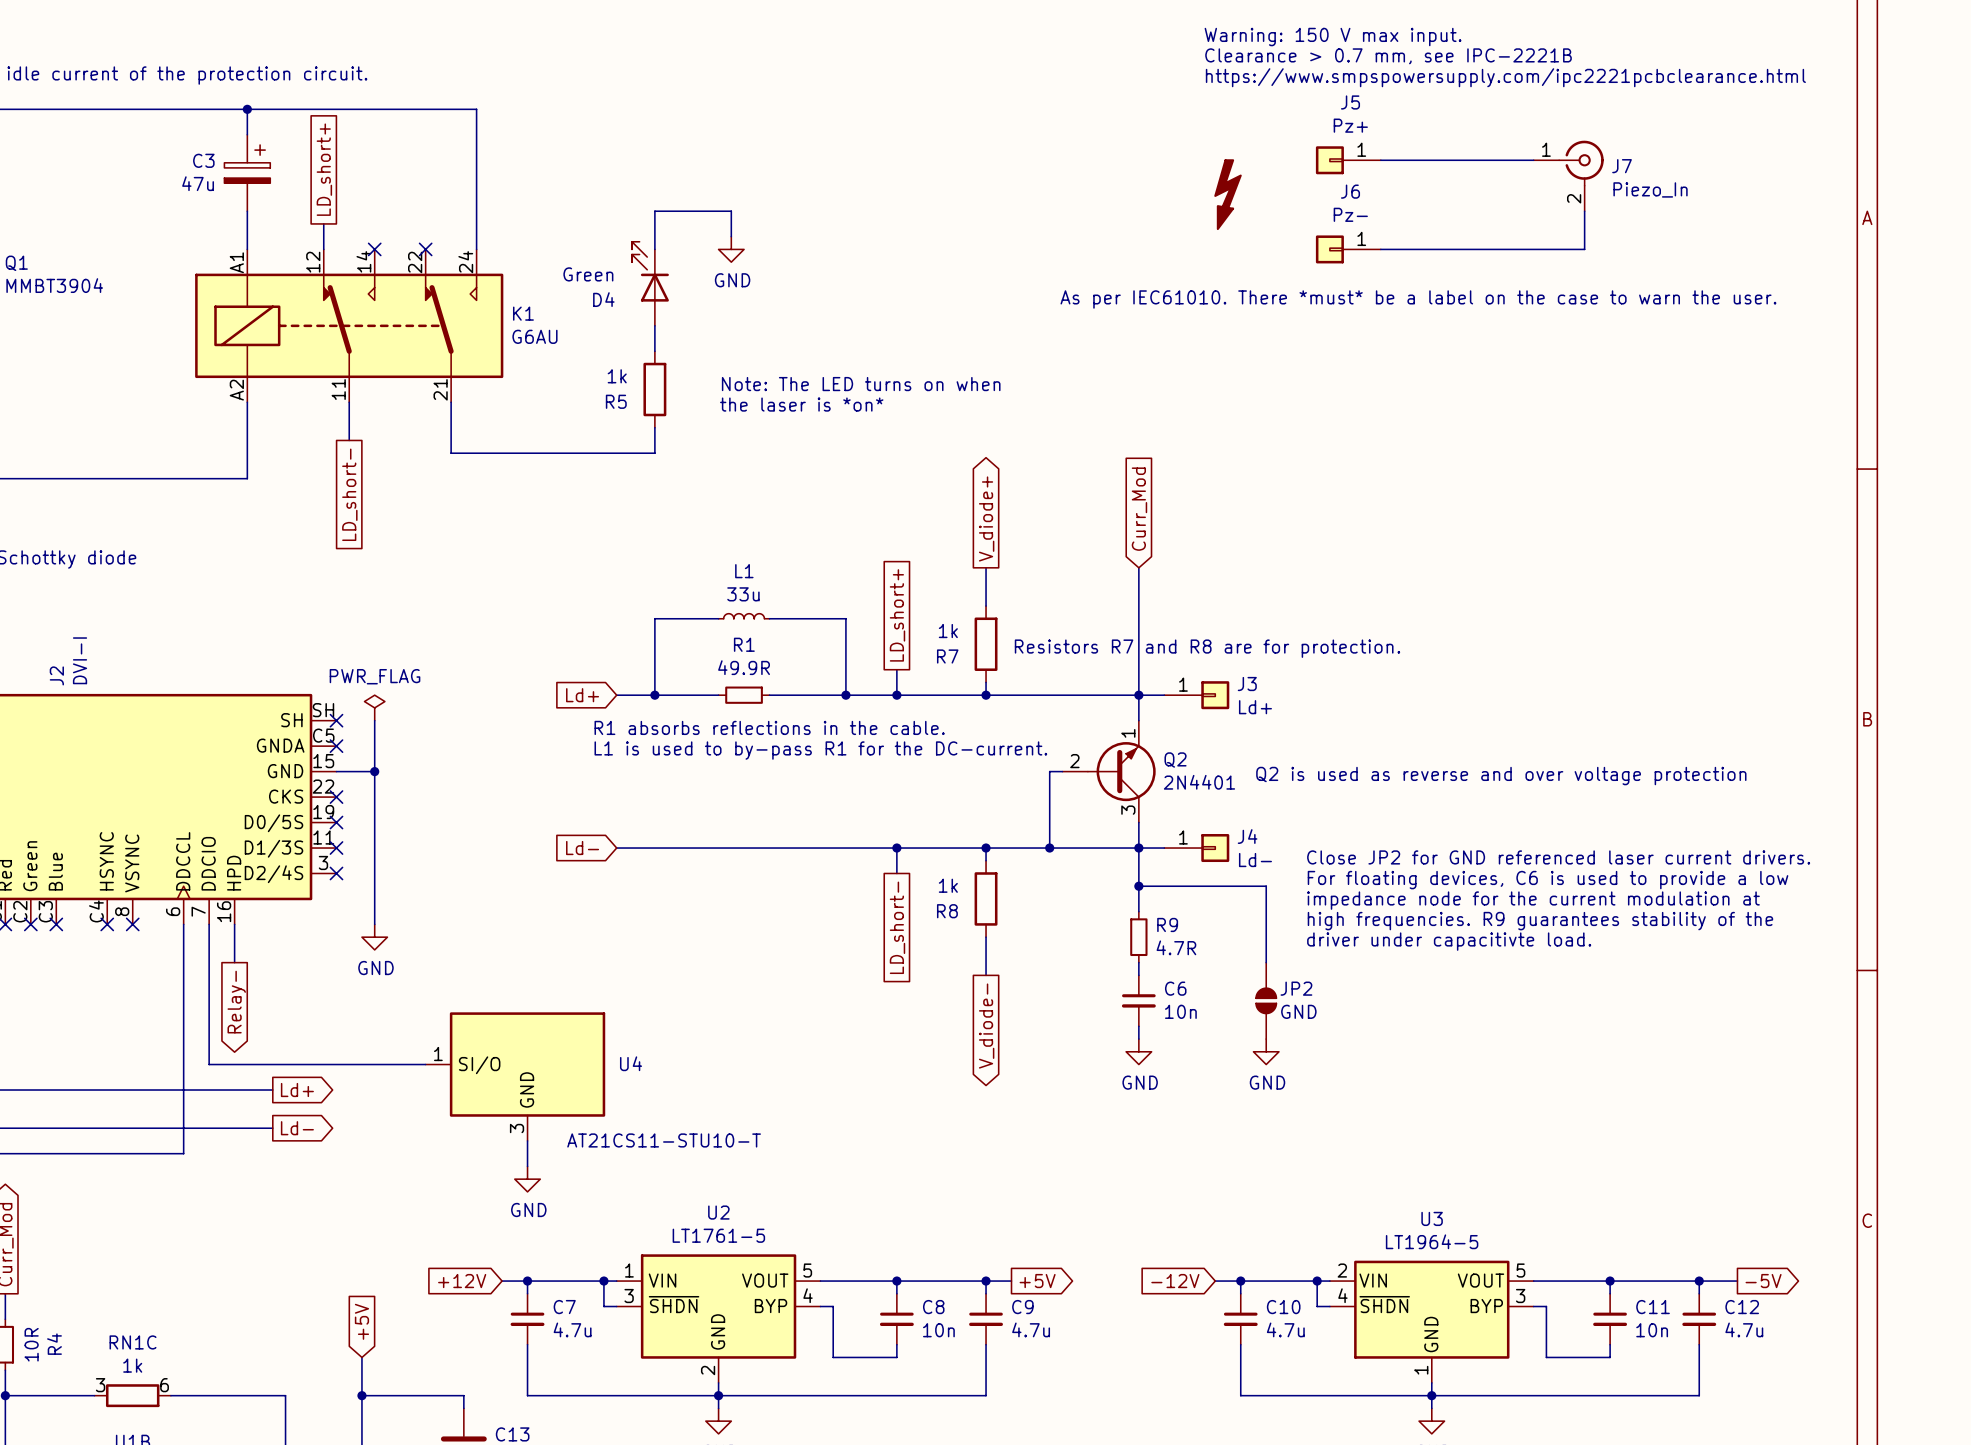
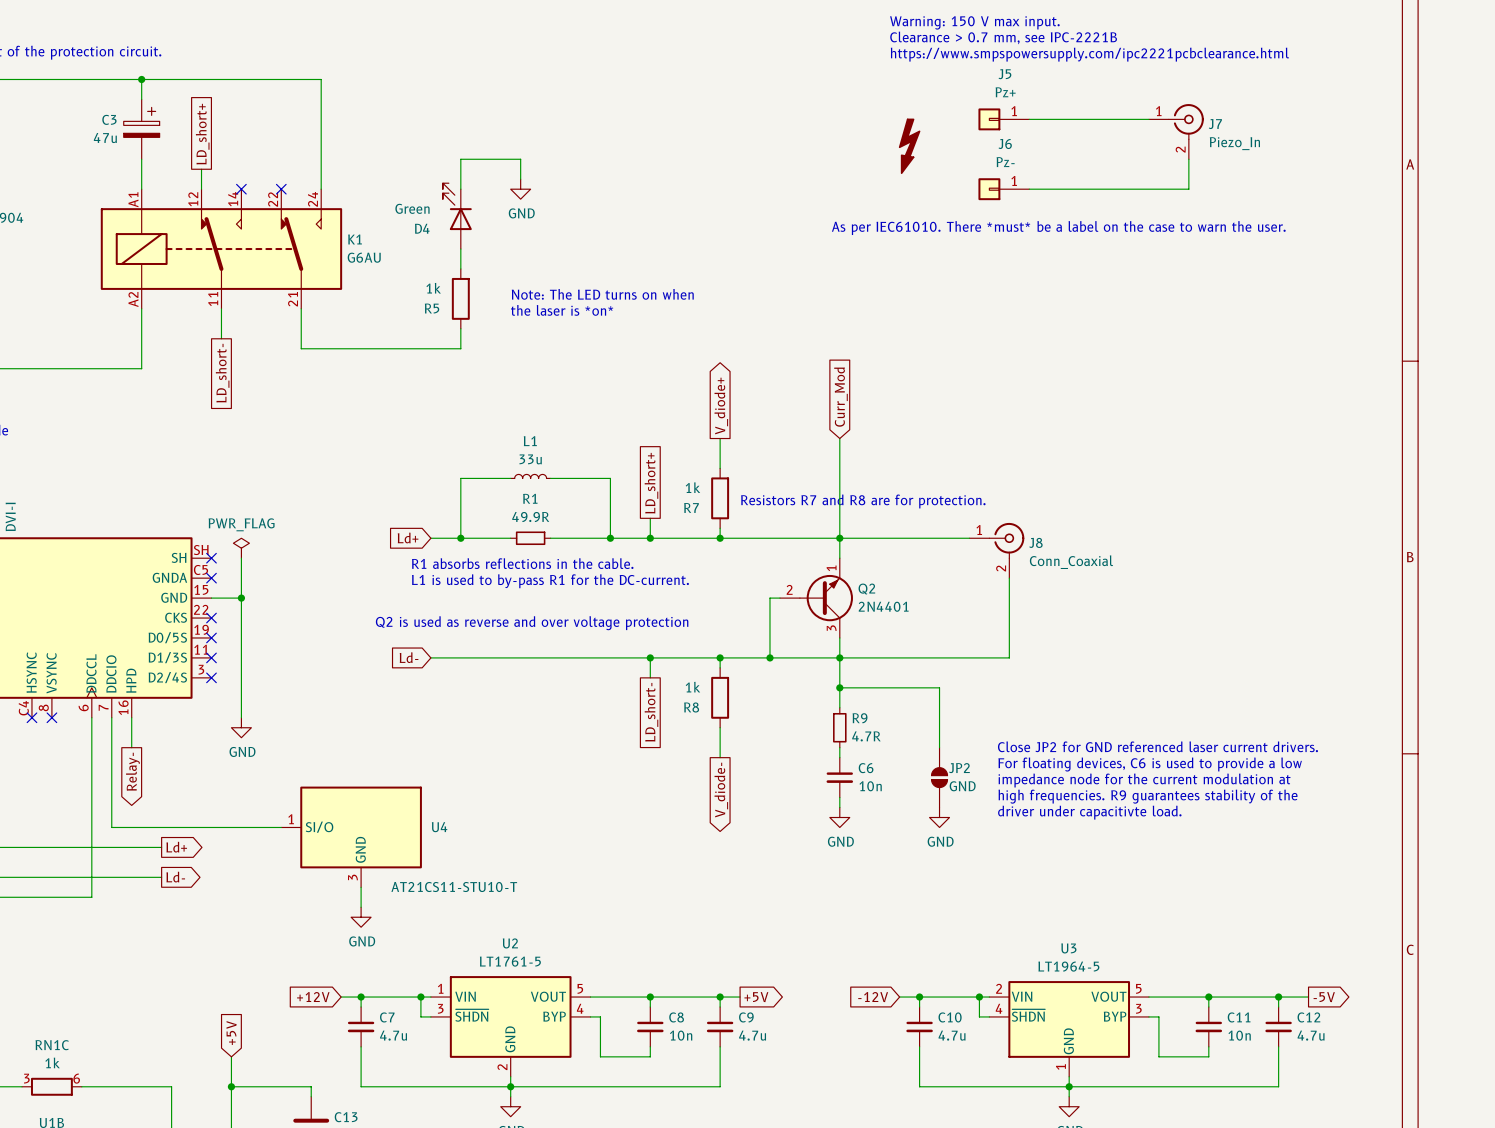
wire: none -> (859, 538) (969, 538)
J3: Ld+ (1196, 695) -> none
J8: none -> Conn_Coaxial (996, 550)
wire: none -> (1009, 578) (1009, 657) (859, 657)
text: Q2 is used as reverse and over voltage protection (1501, 776) -> none
text: none -> Q2 is used as reverse and over voltage protection (532, 623)
J4: Ld- (1196, 848) -> none
text position: Close JP2 for GND referenced laser current drivers. (1558, 857) -> Close JP2 for GND referenced laser current drivers. (1157, 746)
text position: For floating devices, C6 is used to provide a low (1548, 880) -> For floating devices, C6 is used to provide a low (1150, 764)
text position: impedance node for the current modulation at (1533, 900) -> impedance node for the current modulation at (1144, 780)
text position: high frequencies. R9 guarantees stability of the (1540, 921) -> high frequencies. R9 guarantees stability of the (1148, 796)
text position: driver under capacitivte load. (1449, 941) -> driver under capacitivte load. (1089, 812)

